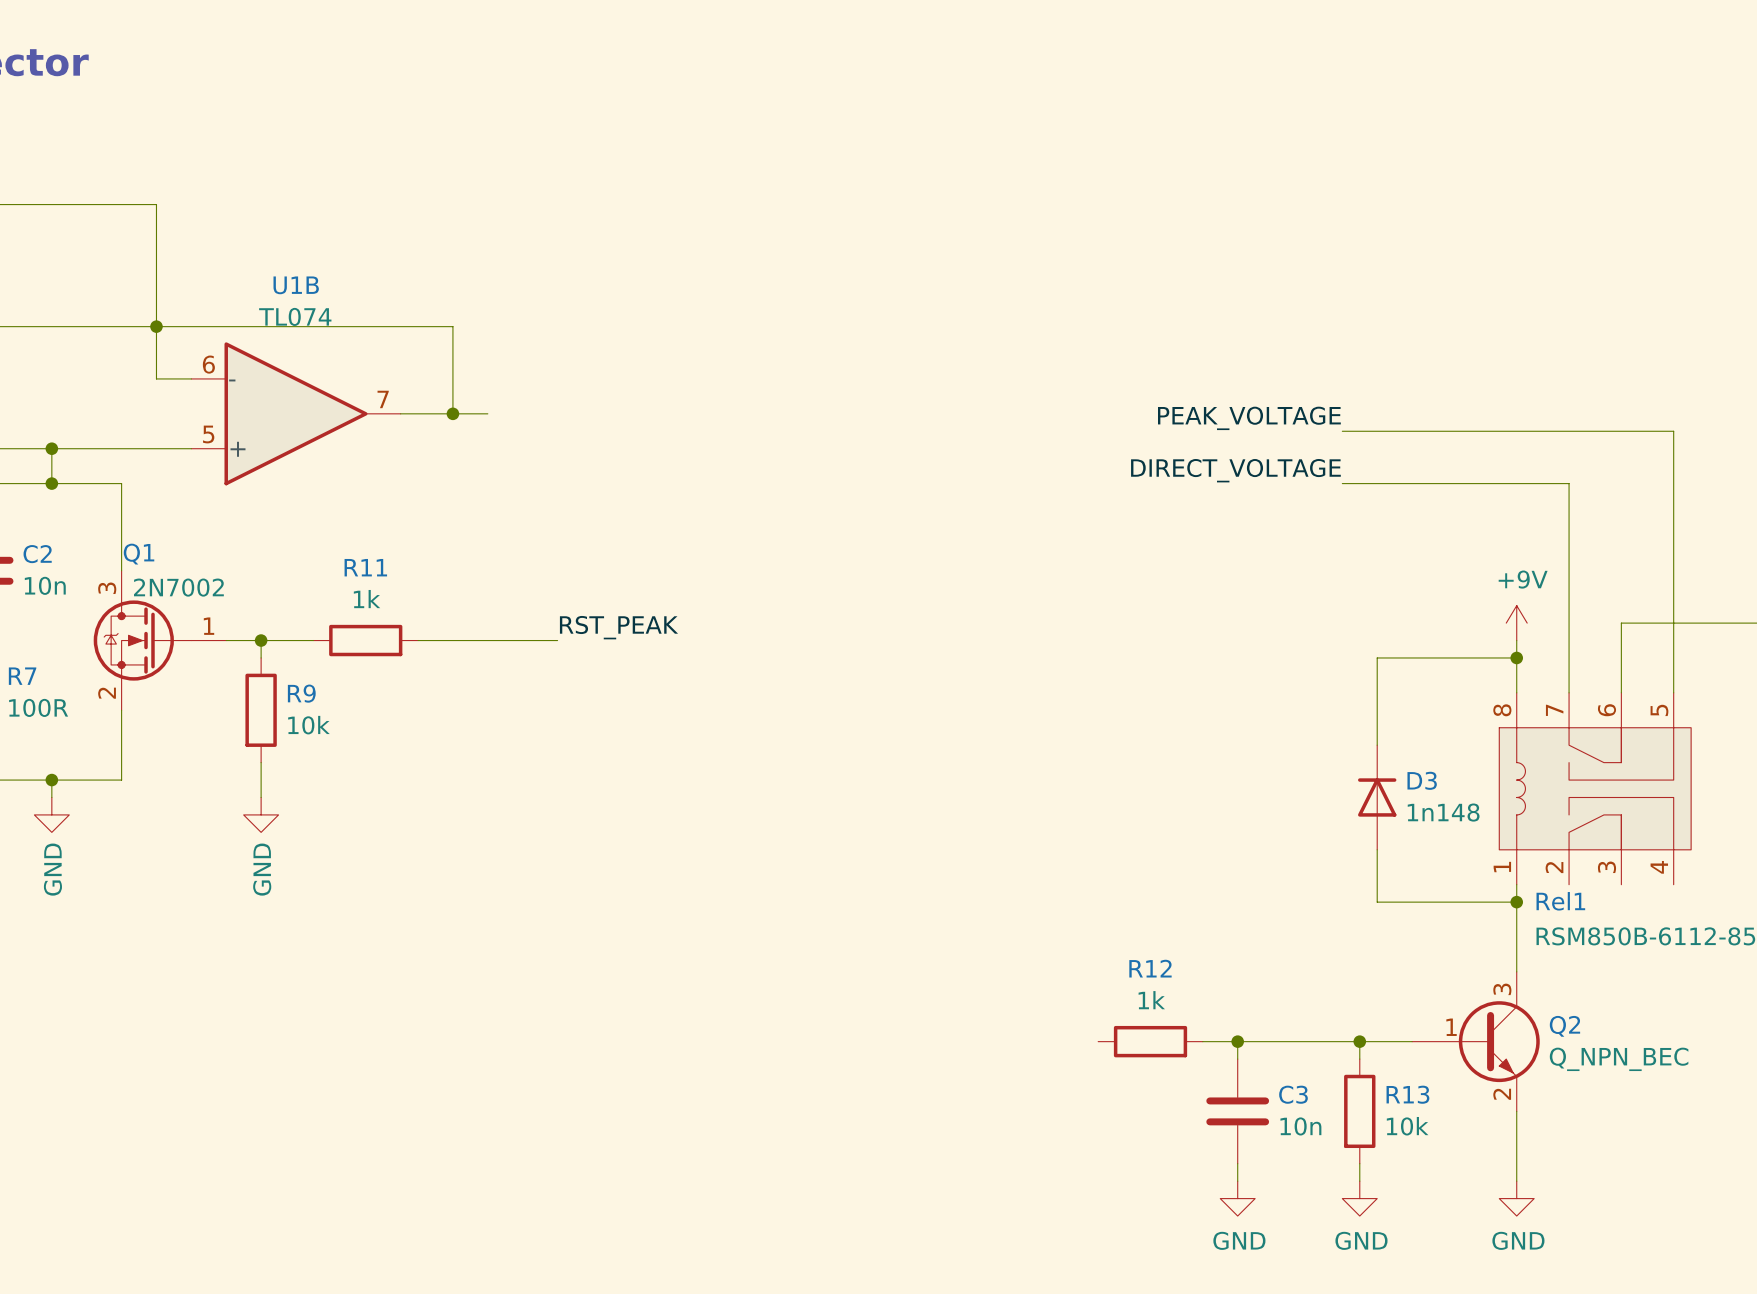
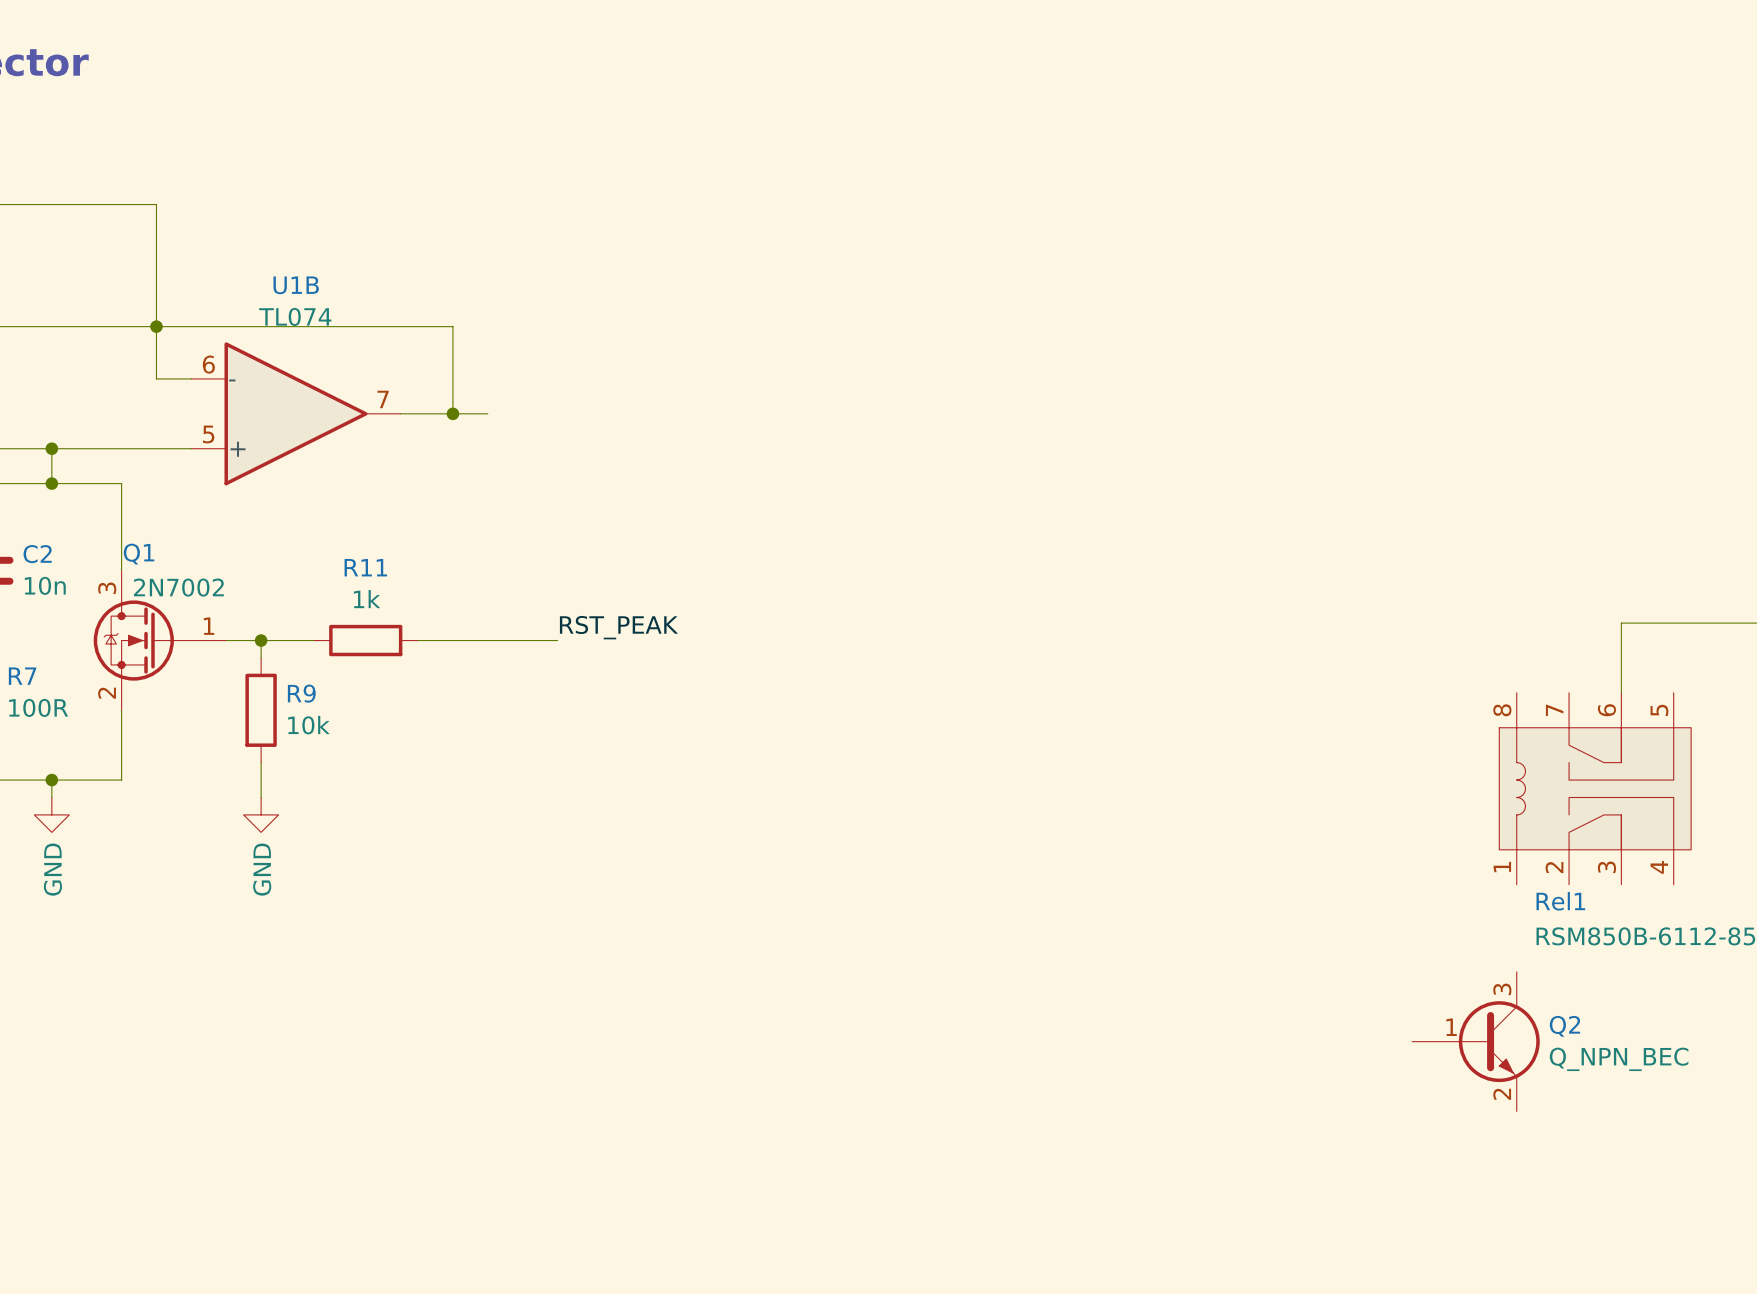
label: PEAK_VOLTAGE (1249, 418) -> none
wire: (1342, 431) (1673, 431) (1673, 692) -> none
label: DIRECT_VOLTAGE (1235, 470) -> none
wire: (1342, 483) (1569, 483) (1569, 692) -> none
power symbol: +9V (1516, 623) -> none
wire: (1516, 640) (1516, 692) -> none
wire: (1516, 657) (1377, 657) (1377, 745) -> none
junction: (1516, 657) -> none
D3: 1n148 (1377, 797) -> none
wire: (1377, 849) (1377, 902) (1516, 902) -> none
wire: (1516, 884) (1516, 971) -> none
junction: (1516, 902) -> none
R12: 1k (1150, 1041) -> none
wire: (1202, 1041) (1412, 1041) -> none
wire: (1237, 1041) (1237, 1059) -> none
junction: (1237, 1041) -> none
wire: (1359, 1041) (1359, 1059) -> none
junction: (1359, 1041) -> none
C3: 10n (1237, 1111) -> none
R13: 10k (1359, 1111) -> none
wire: (1516, 1111) (1516, 1181) -> none
wire: (1237, 1163) (1237, 1181) -> none
wire: (1359, 1163) (1359, 1181) -> none
power symbol: GND (1237, 1198) -> none
power symbol: GND (1359, 1198) -> none
power symbol: GND (1516, 1198) -> none

